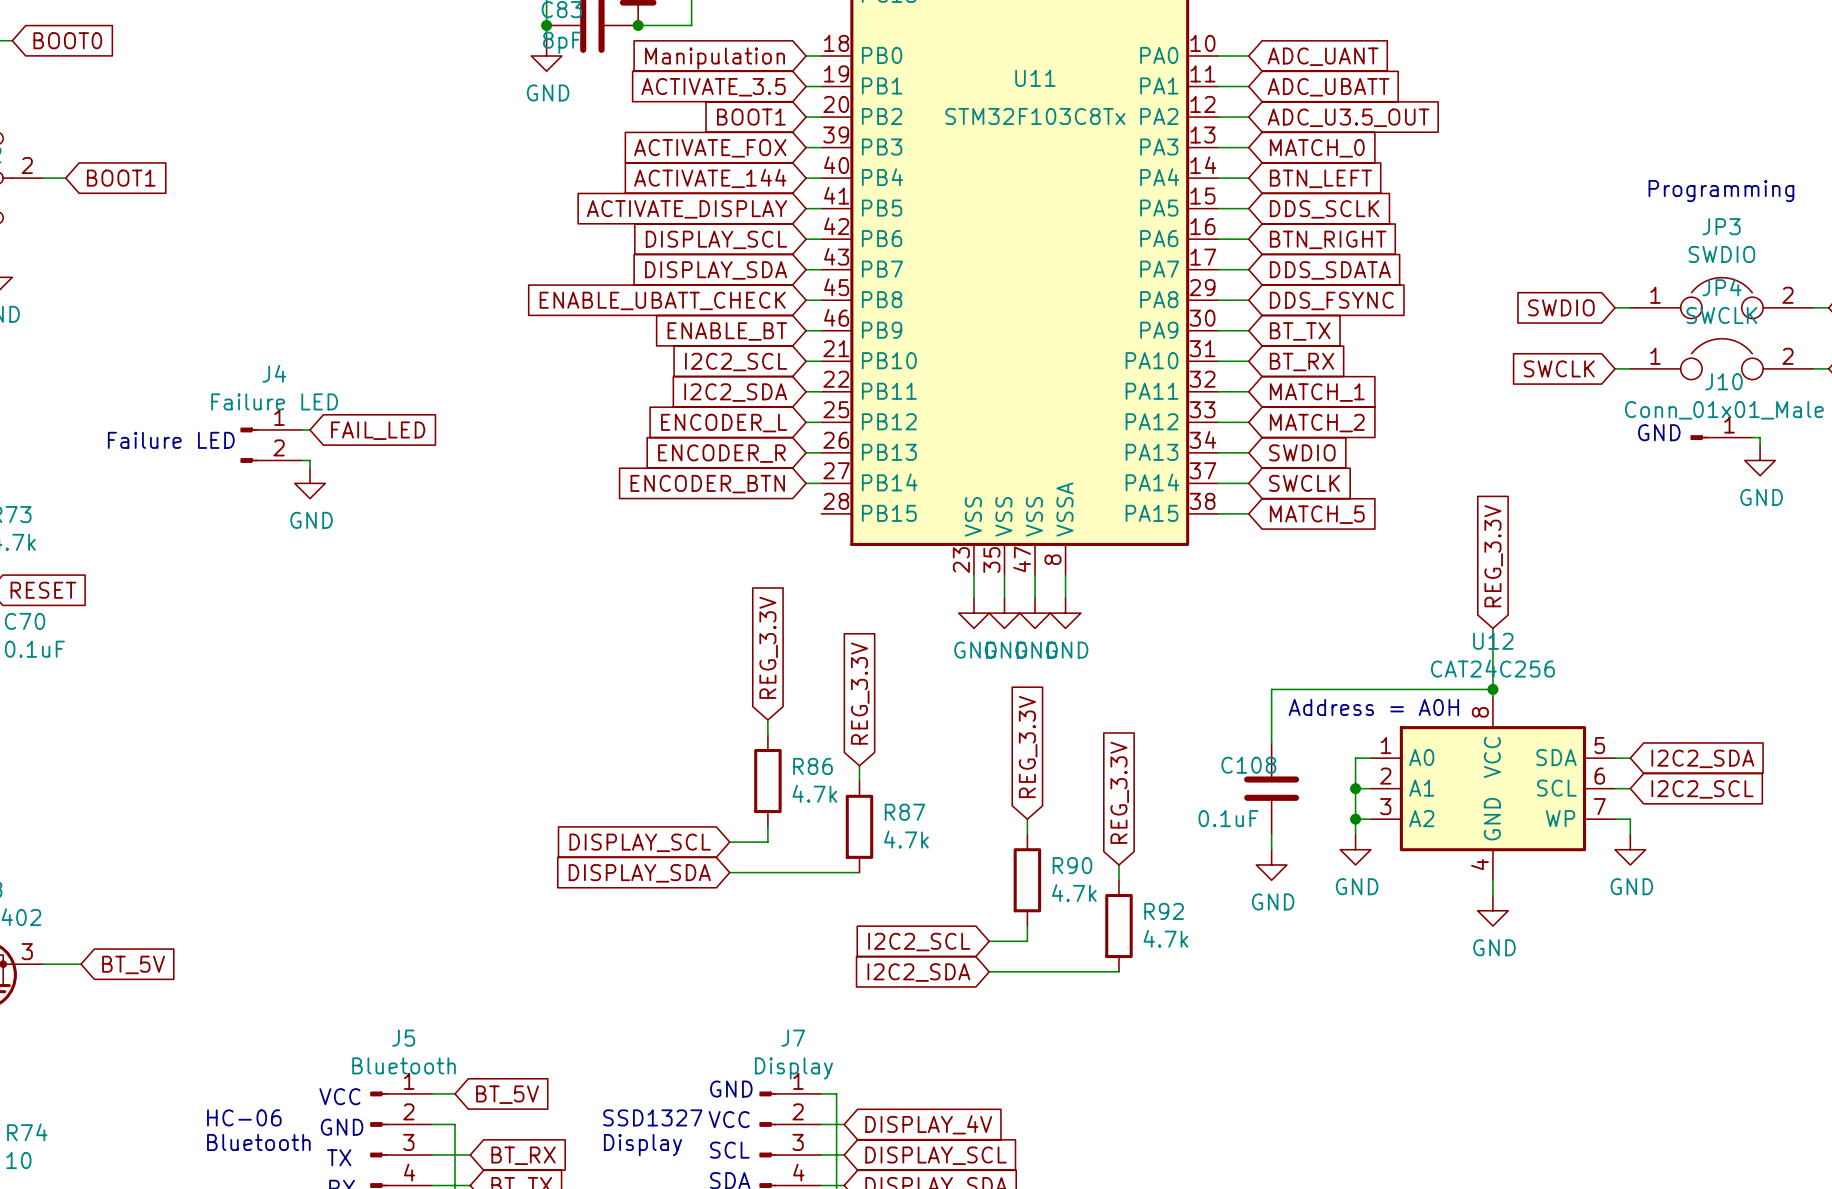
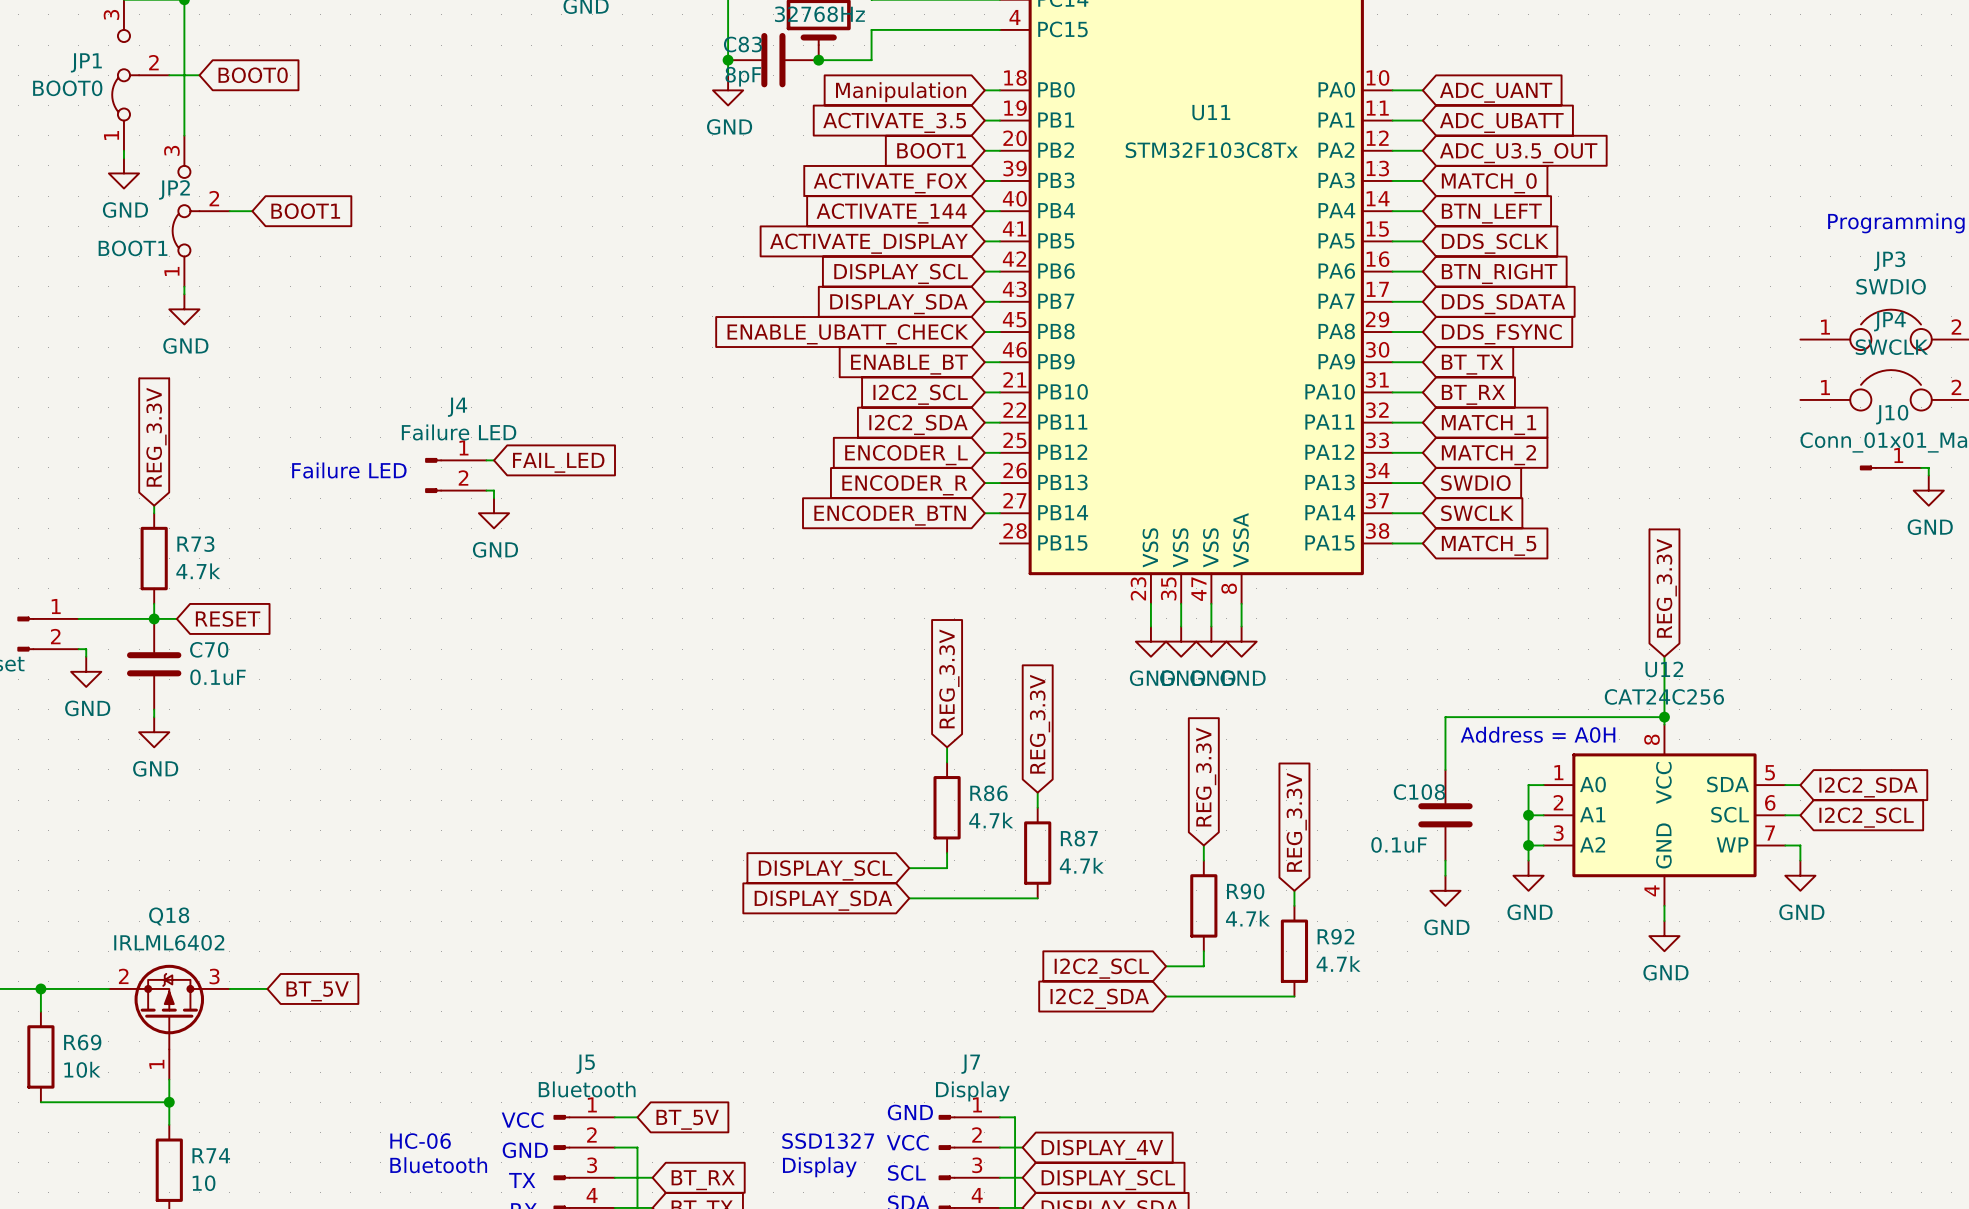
global label: SWDIO (1561, 307) -> none
wire: (1615, 307) (1630, 307) -> none
global label: SWCLK (1559, 368) -> none
wire: (1615, 368) (1630, 368) -> none
text: GND (1659, 432) -> none

